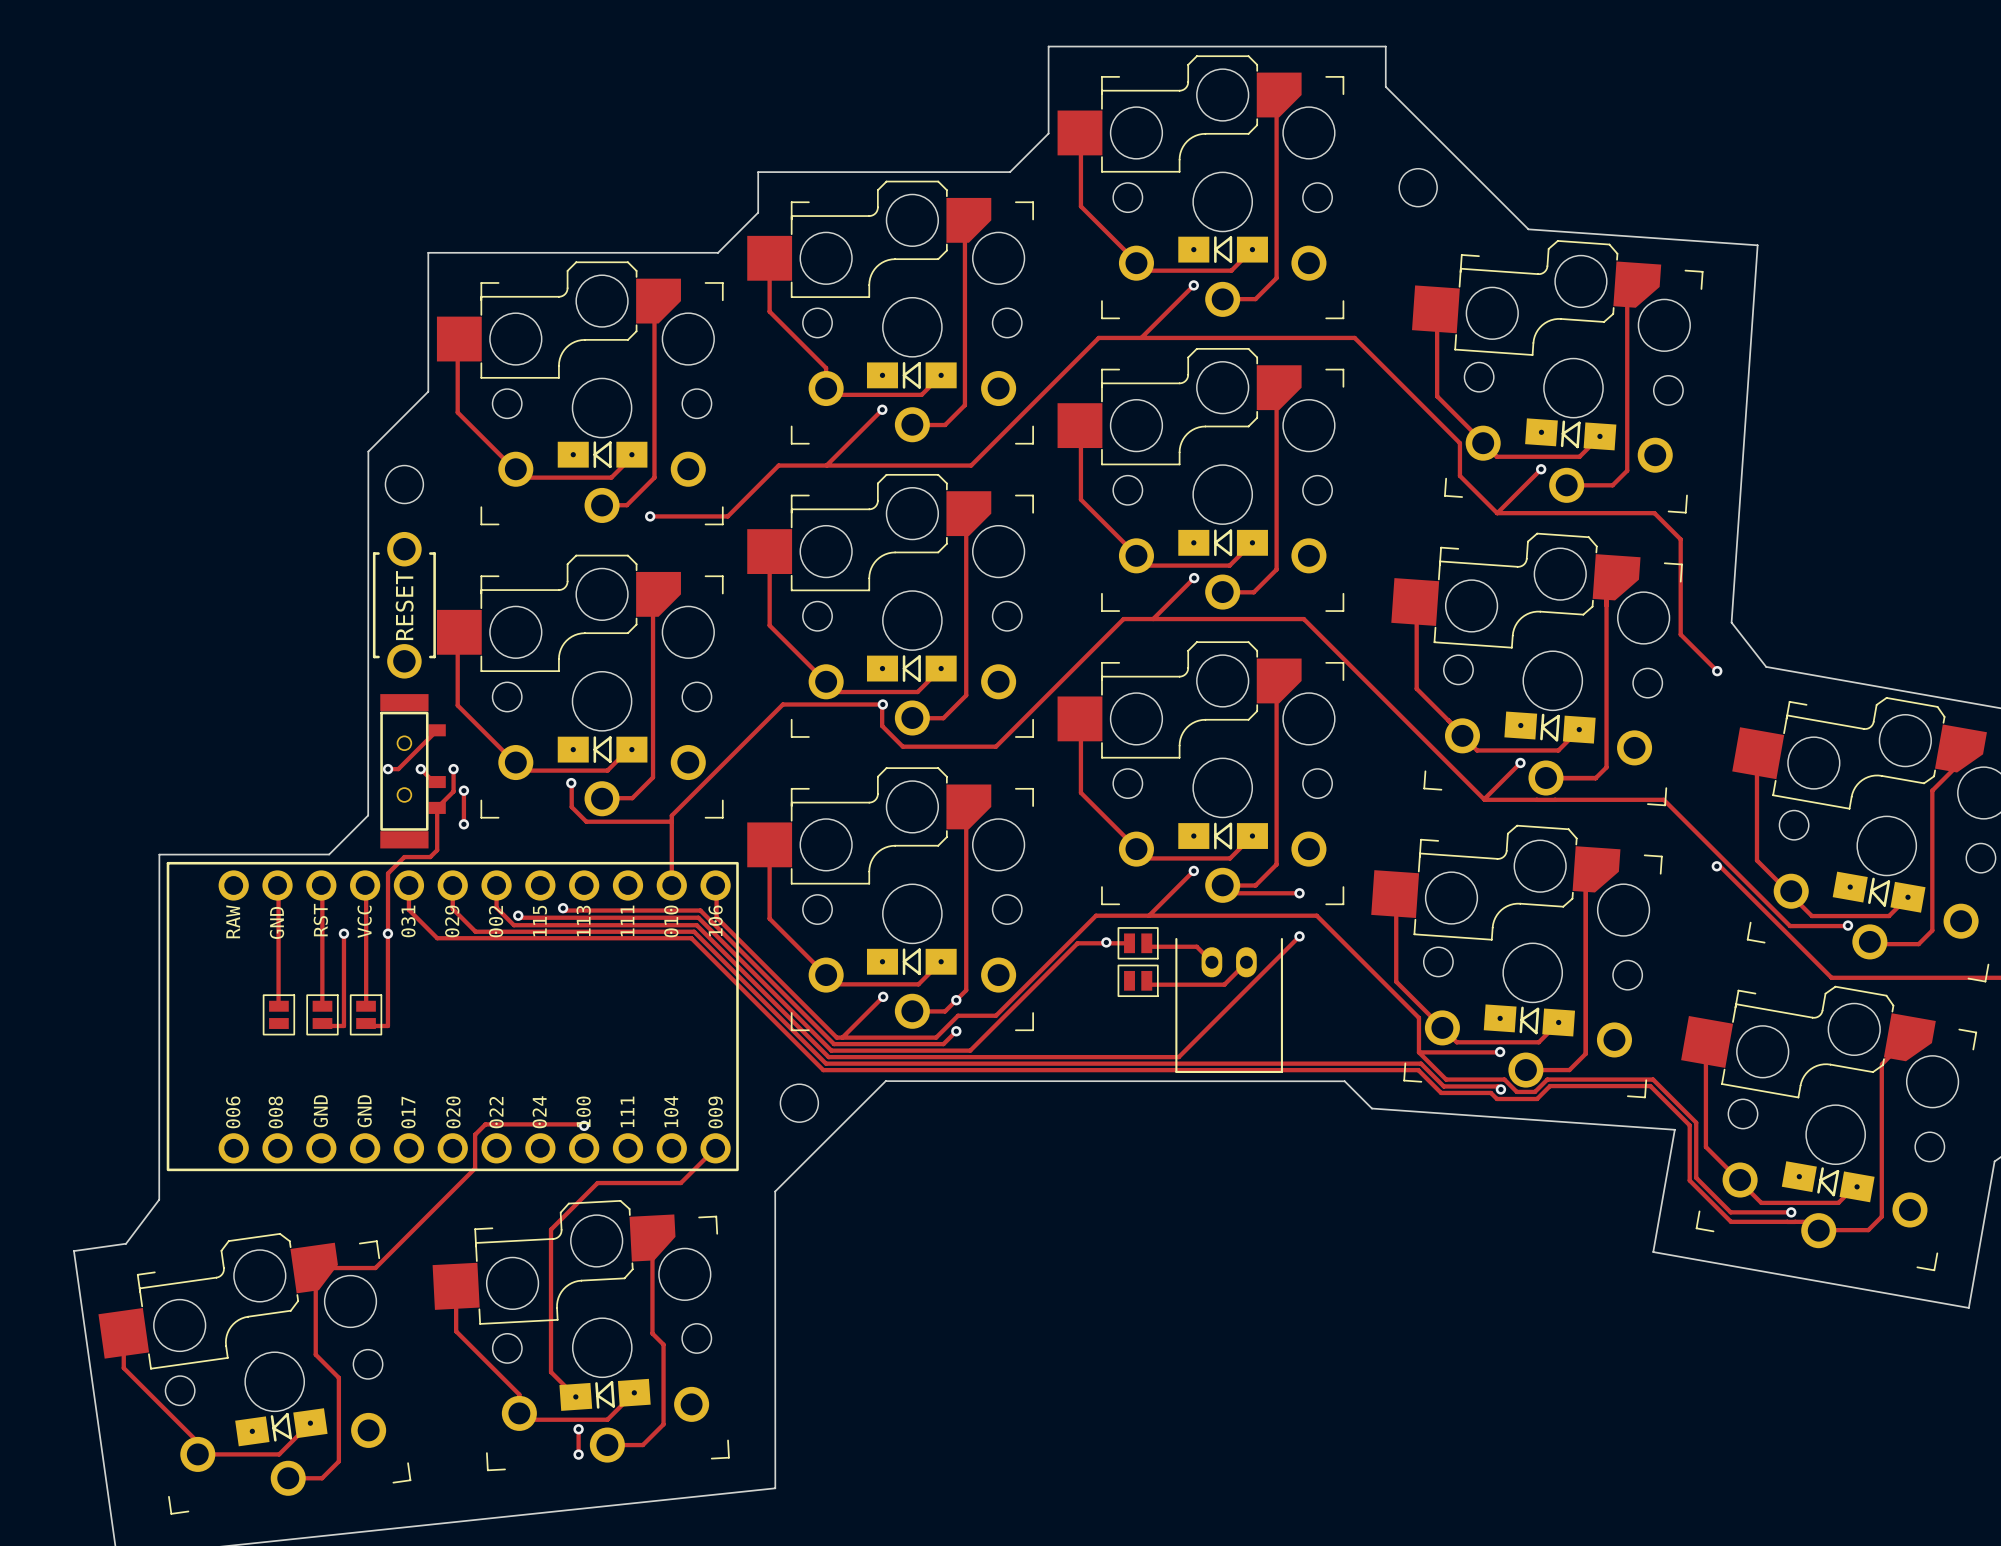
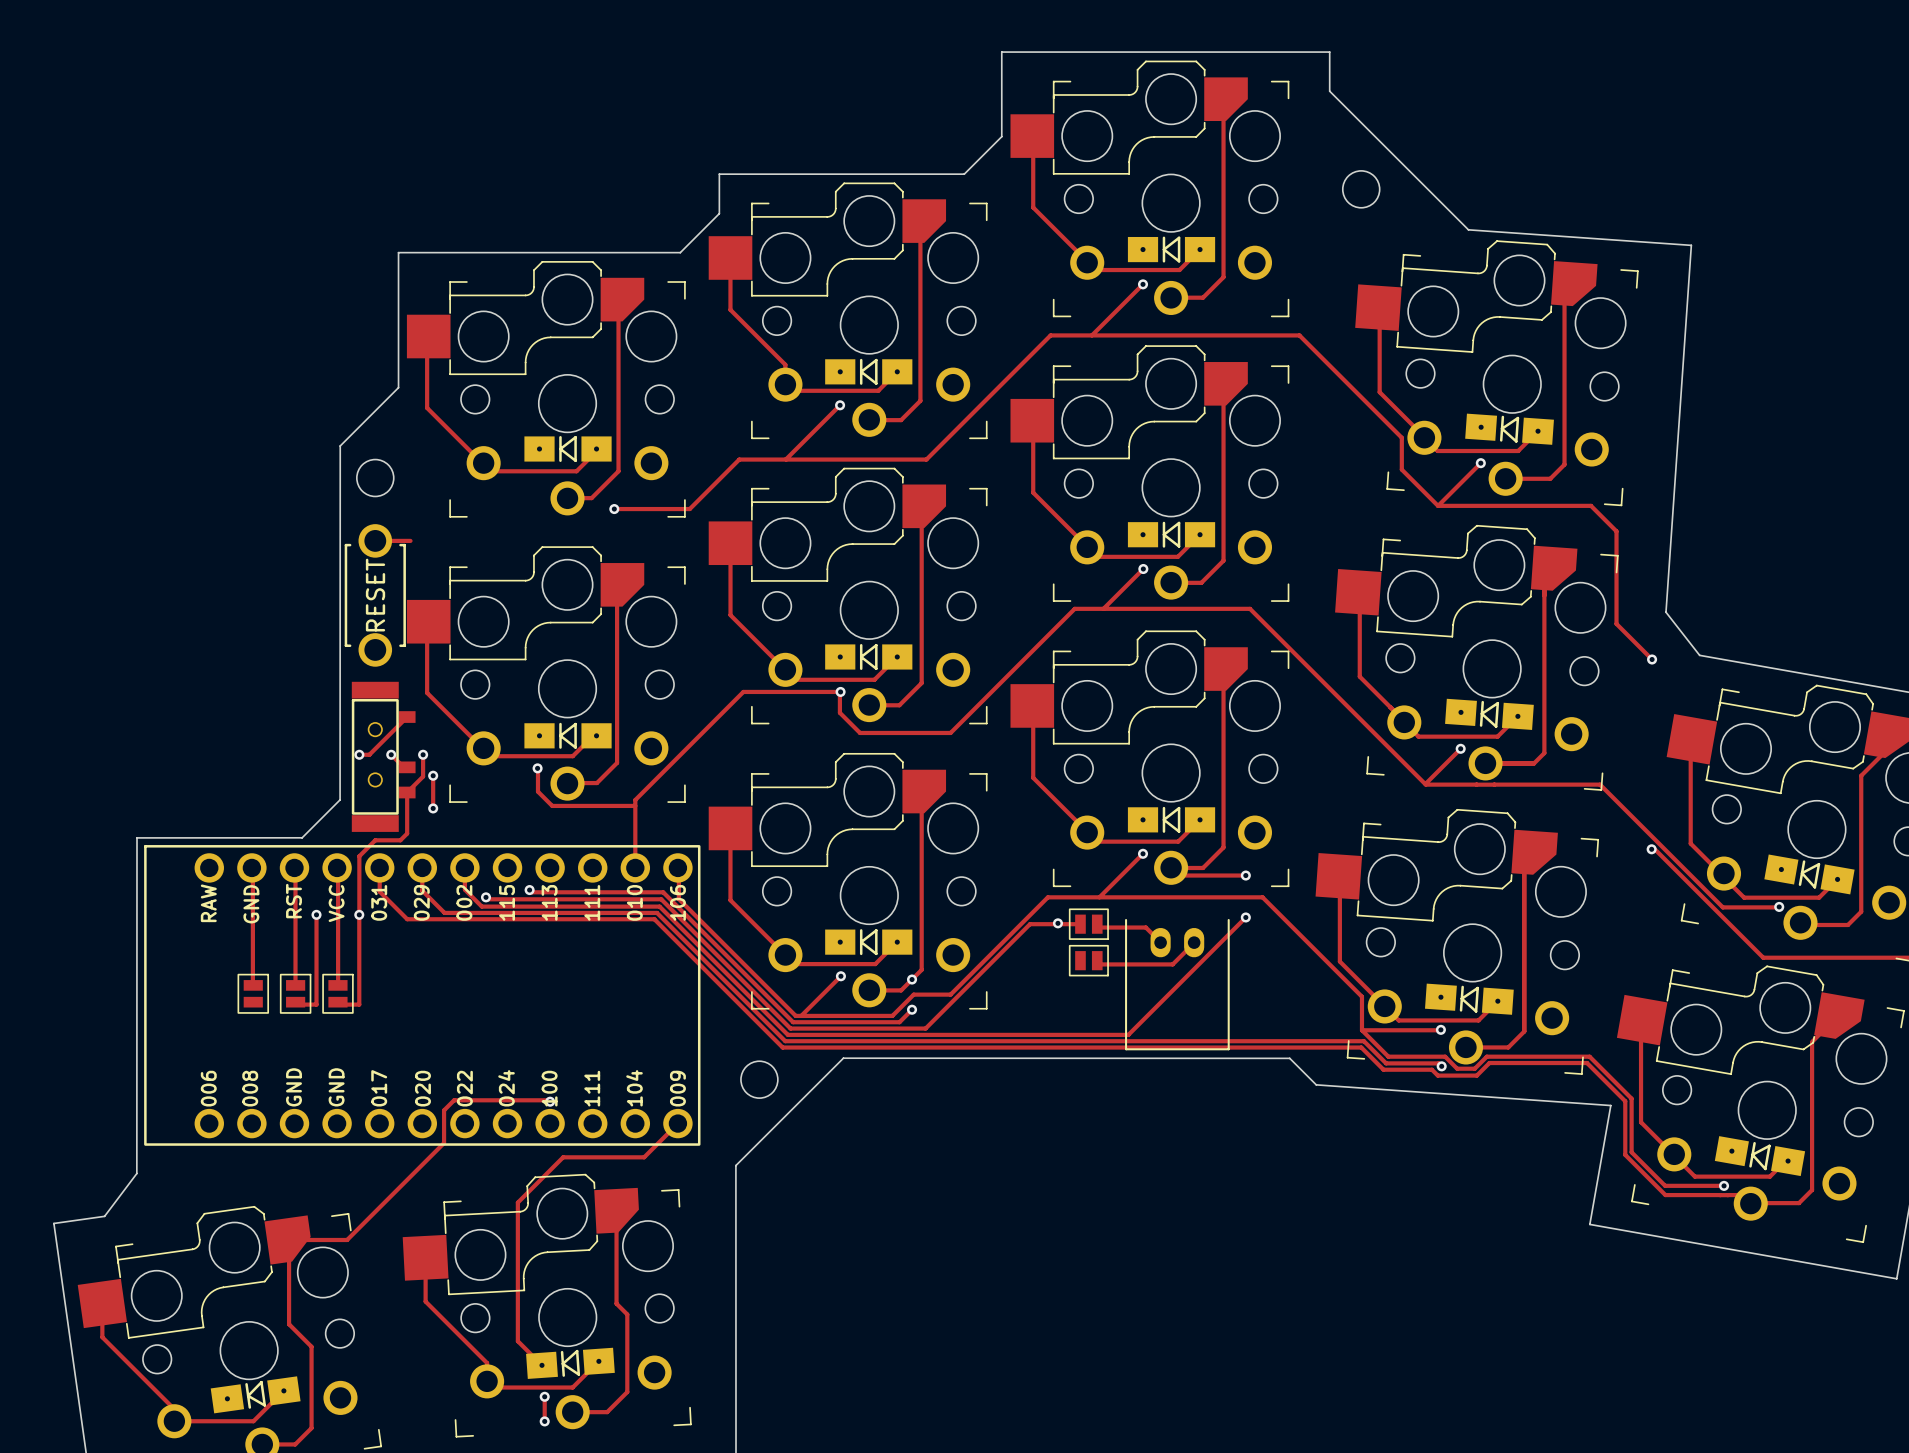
track: none -> (375, 540) (410, 540)

